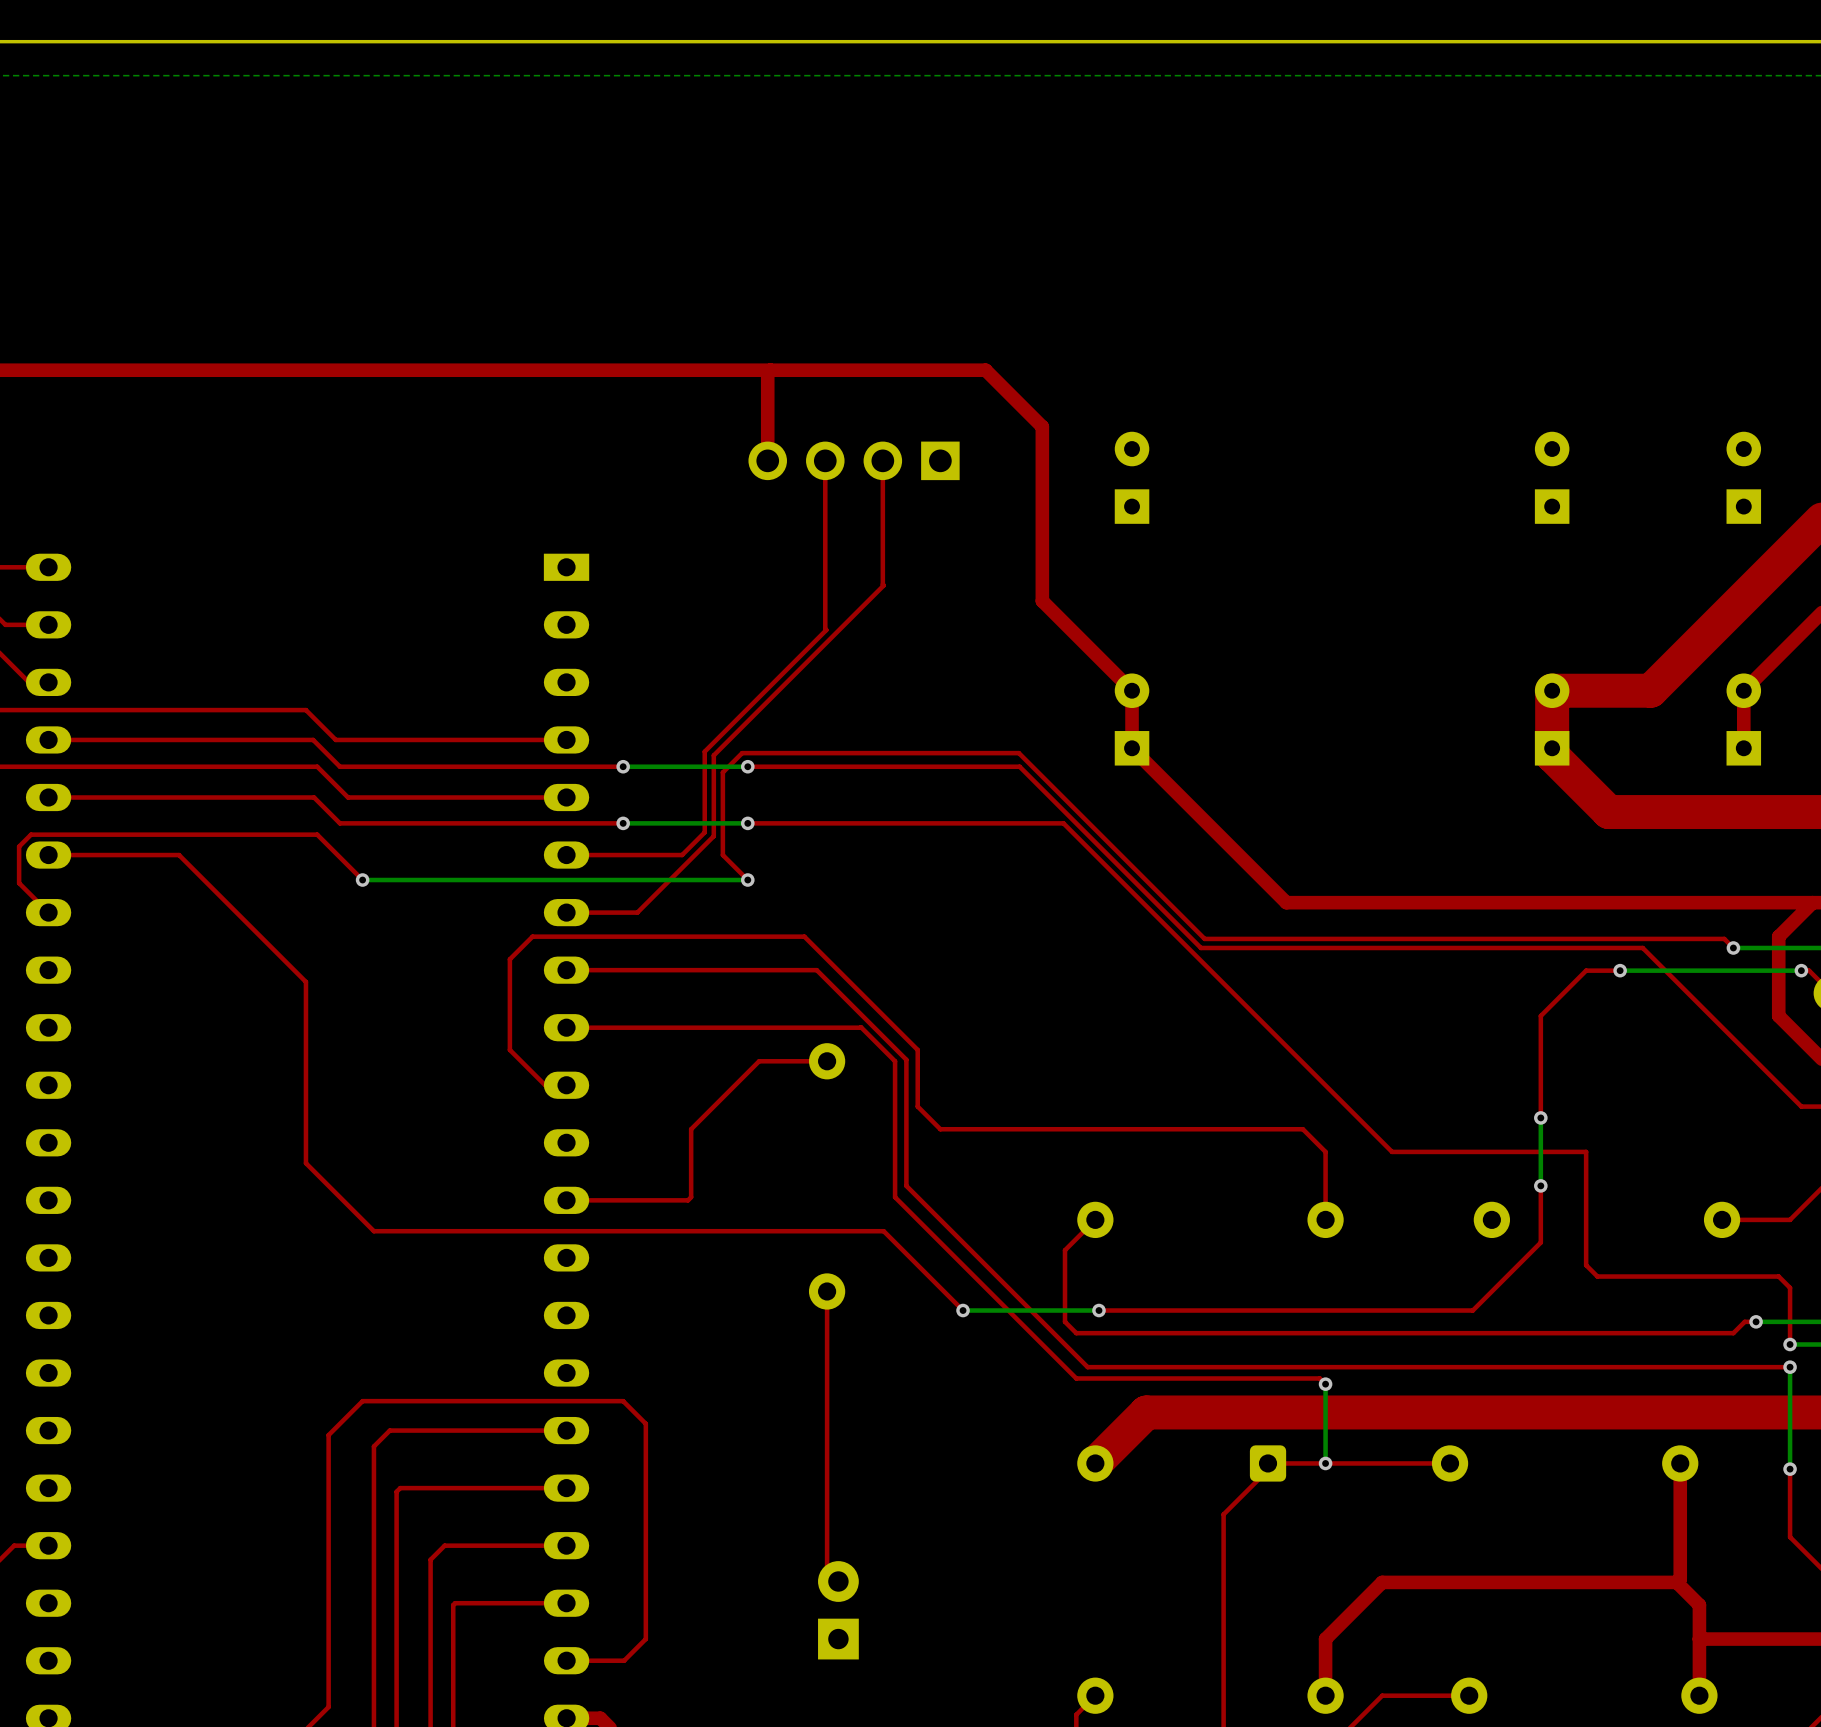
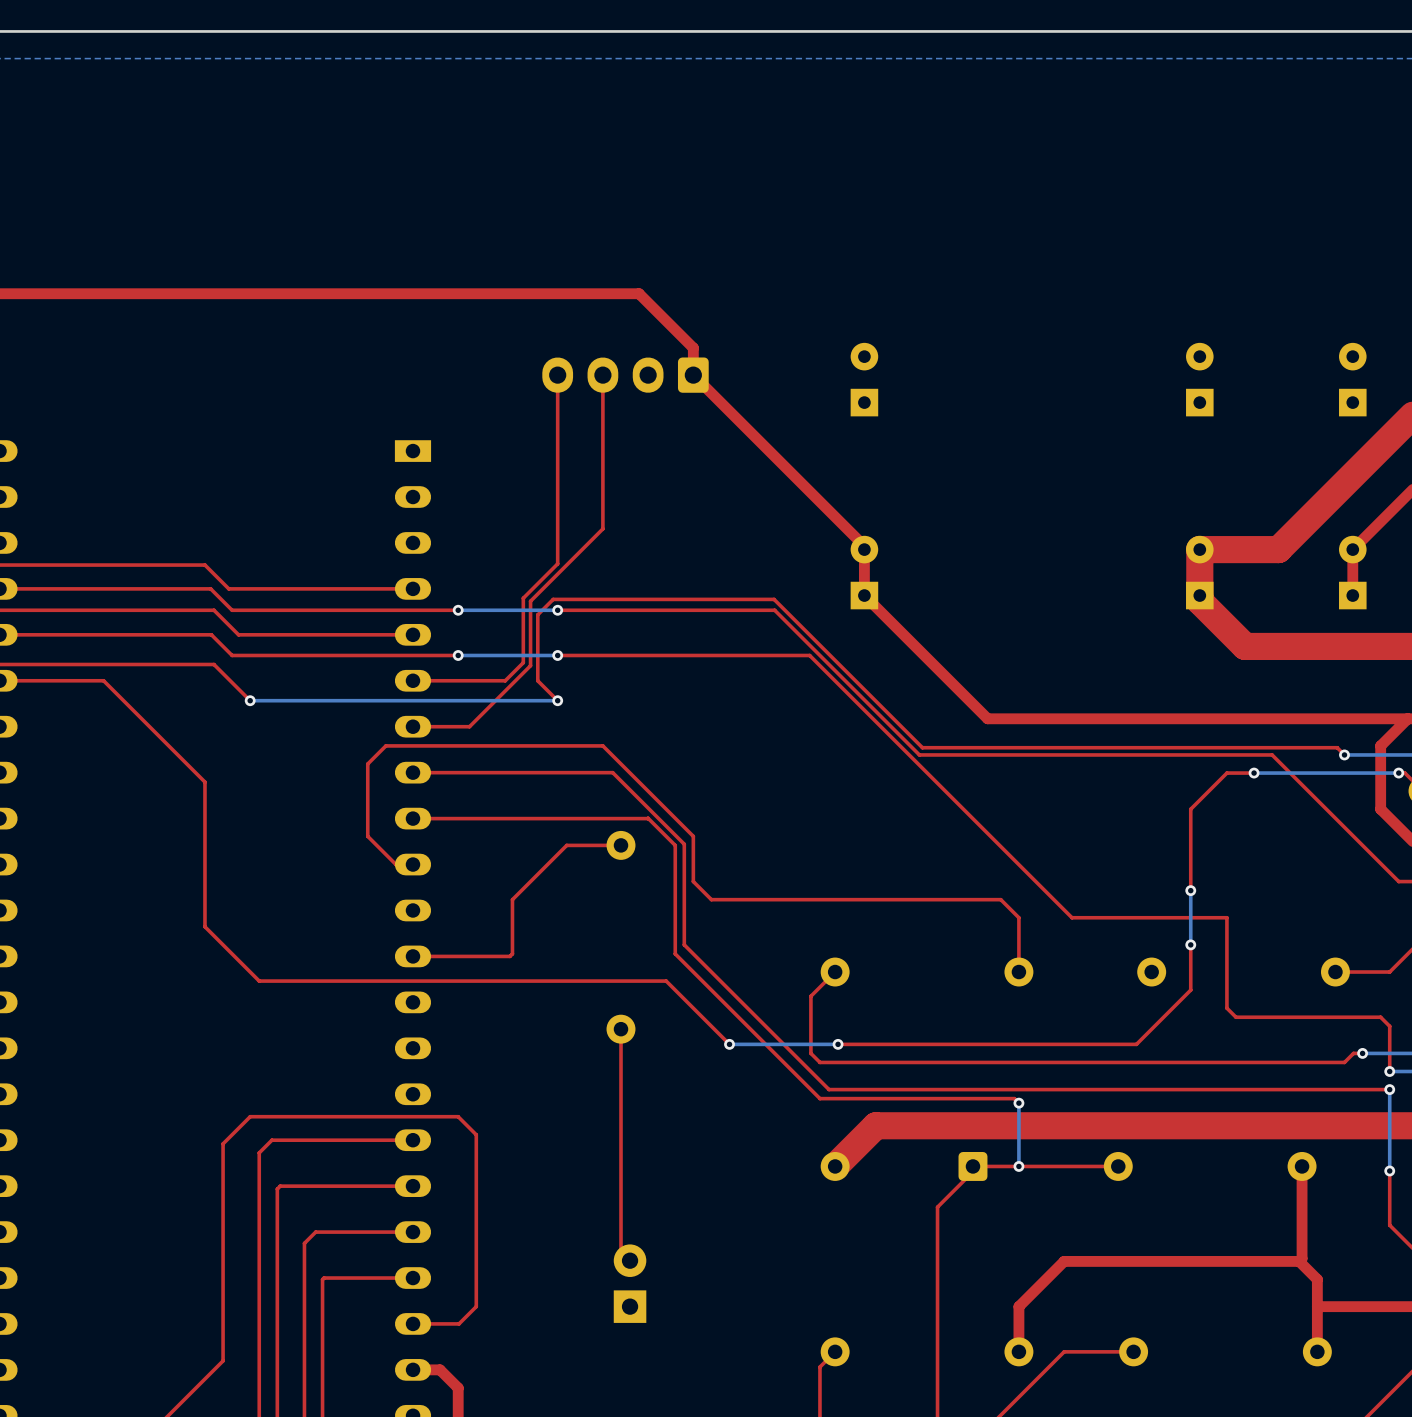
top track: (770, 370) (767, 372) (767, 460) -> none
top track: (849, 370) (985, 370) (1042, 426) (1042, 601) (1132, 690) -> (639, 293) (693, 347) (693, 375) (865, 546)
top track: (825, 460) (826, 630) (747, 708) -> (557, 375) (557, 563)
part: (854, 460) -> none
top track: (882, 460) (883, 585) (804, 664) -> (602, 375) (602, 528)
part: none -> (625, 375)

